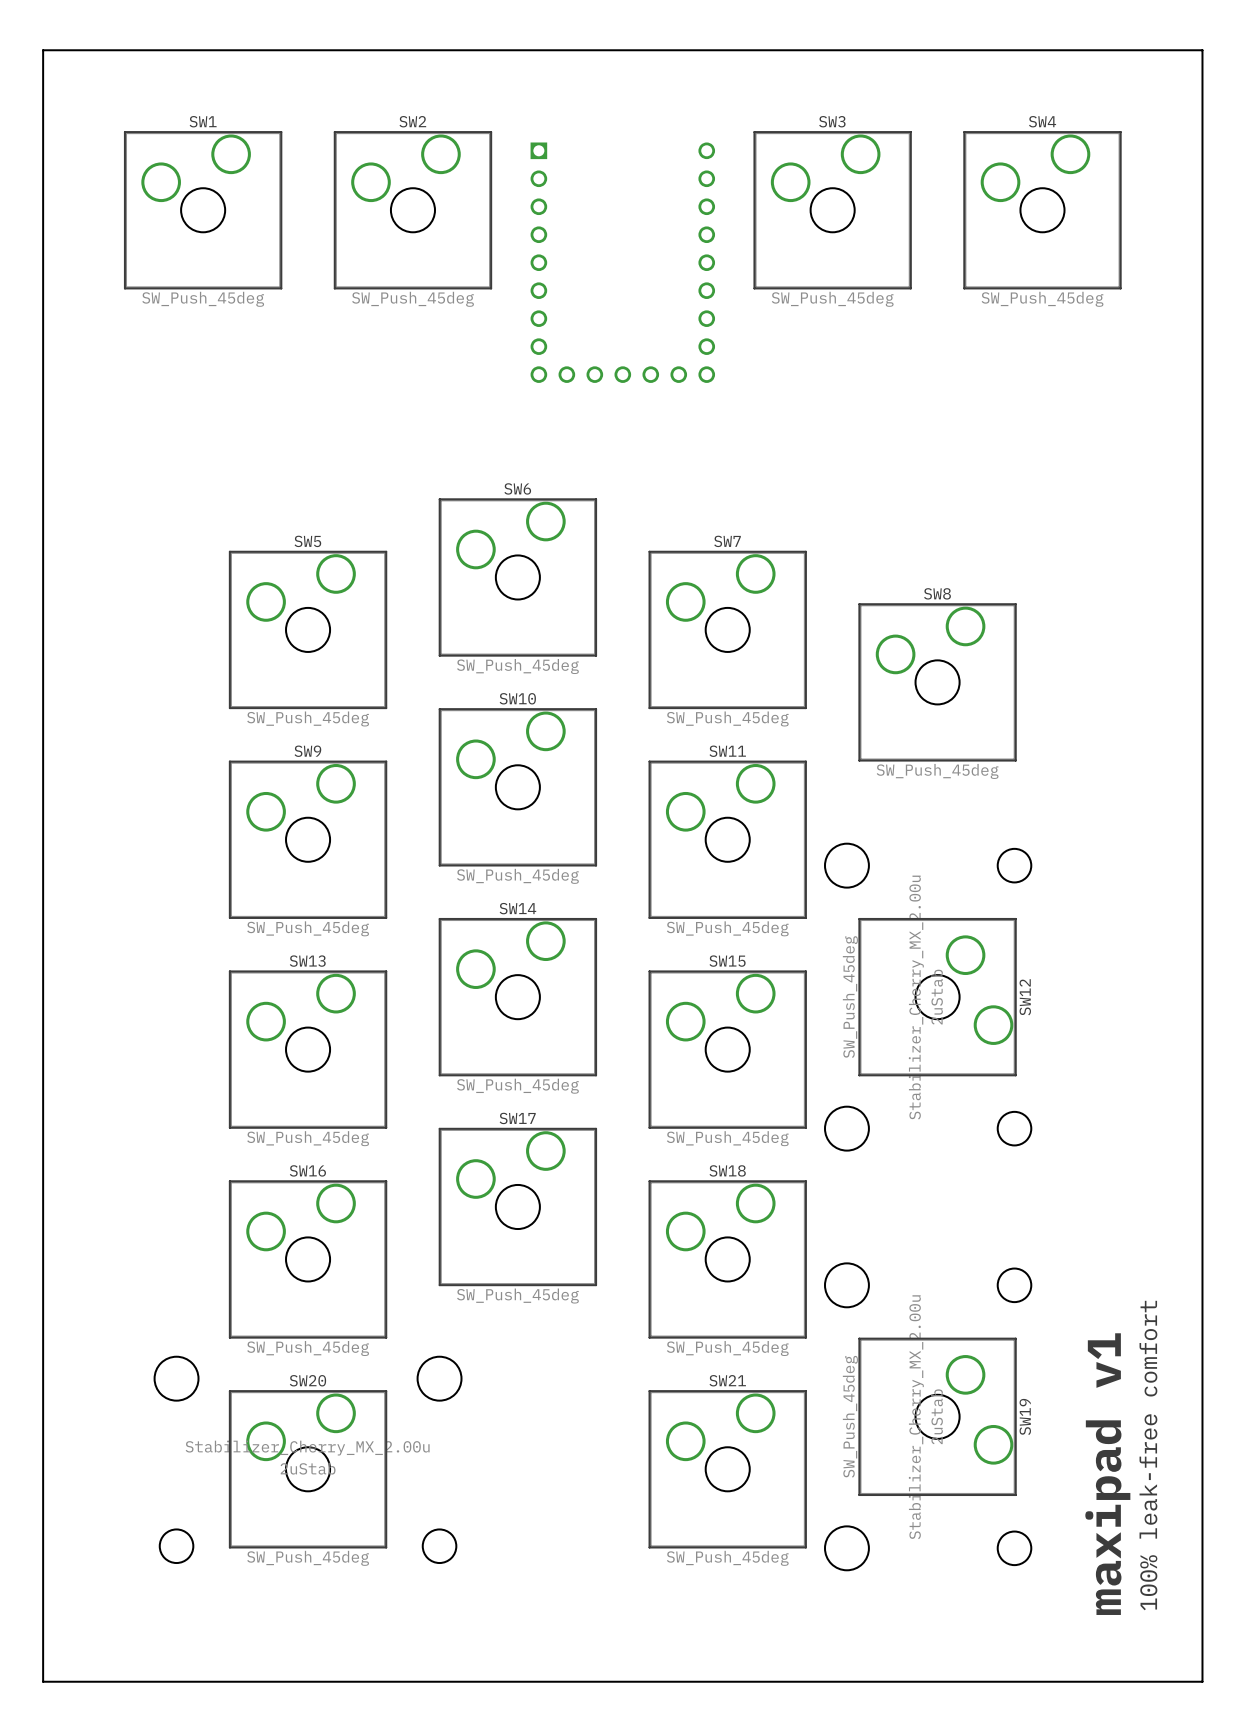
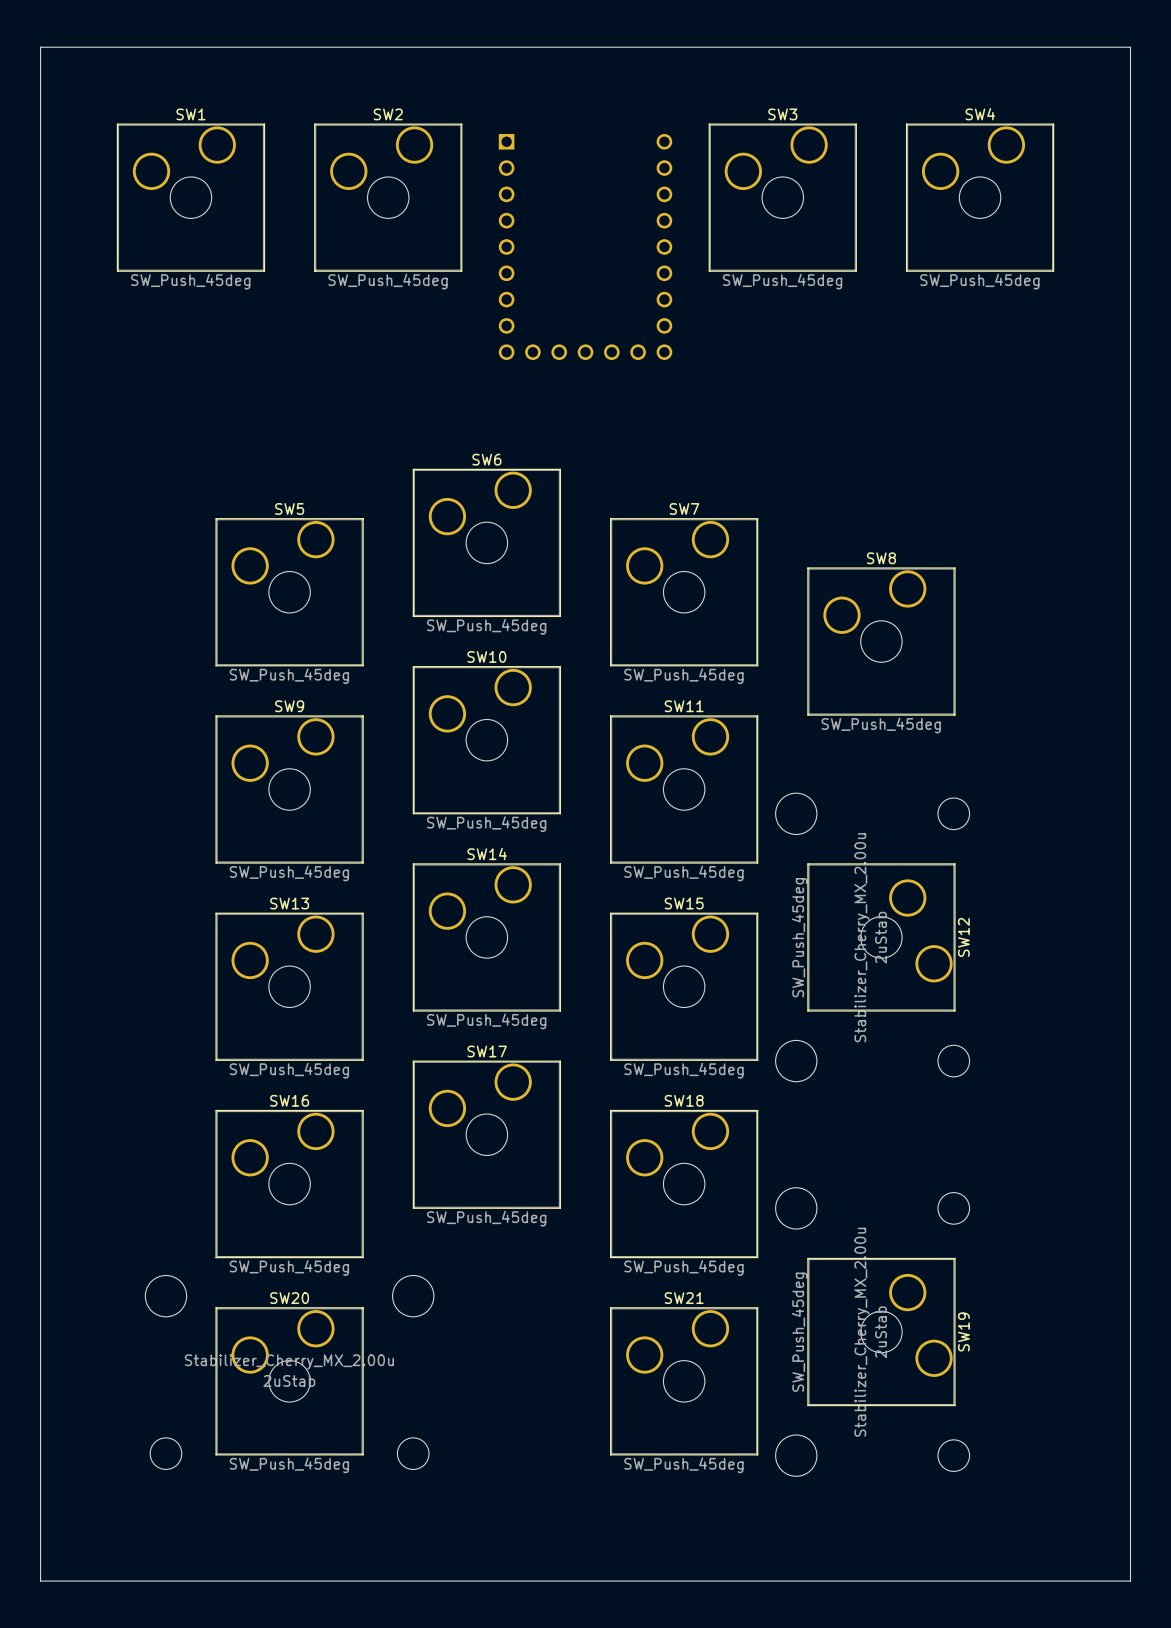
text: 100% leak-free comfort (1148, 1455) -> none
text: maxipad v1 (1107, 1474) -> none

